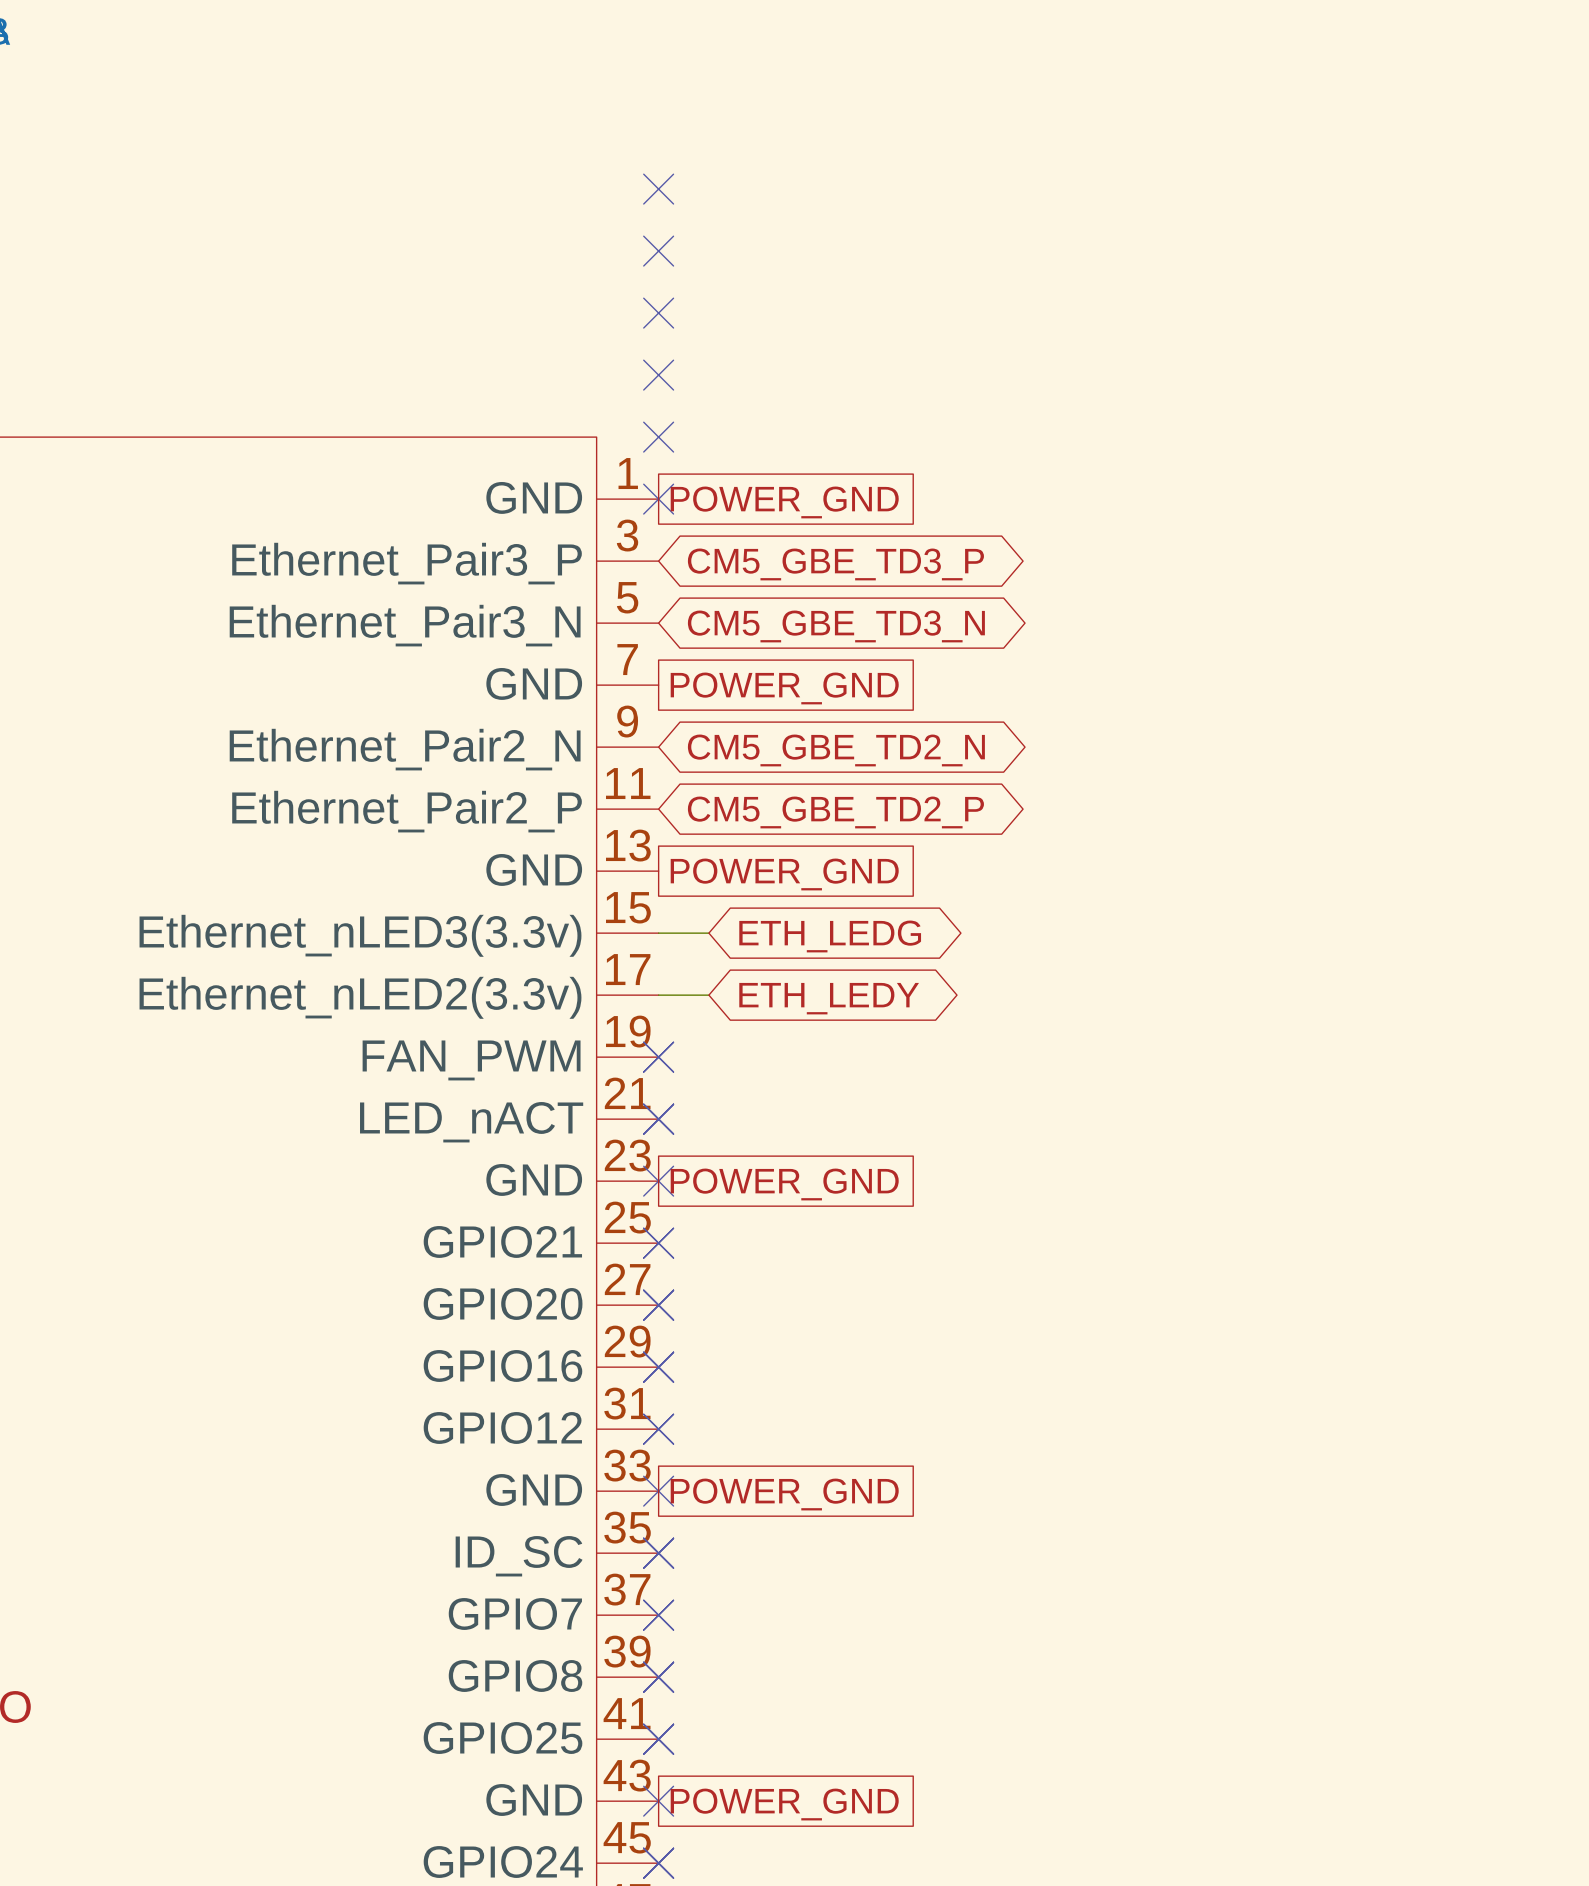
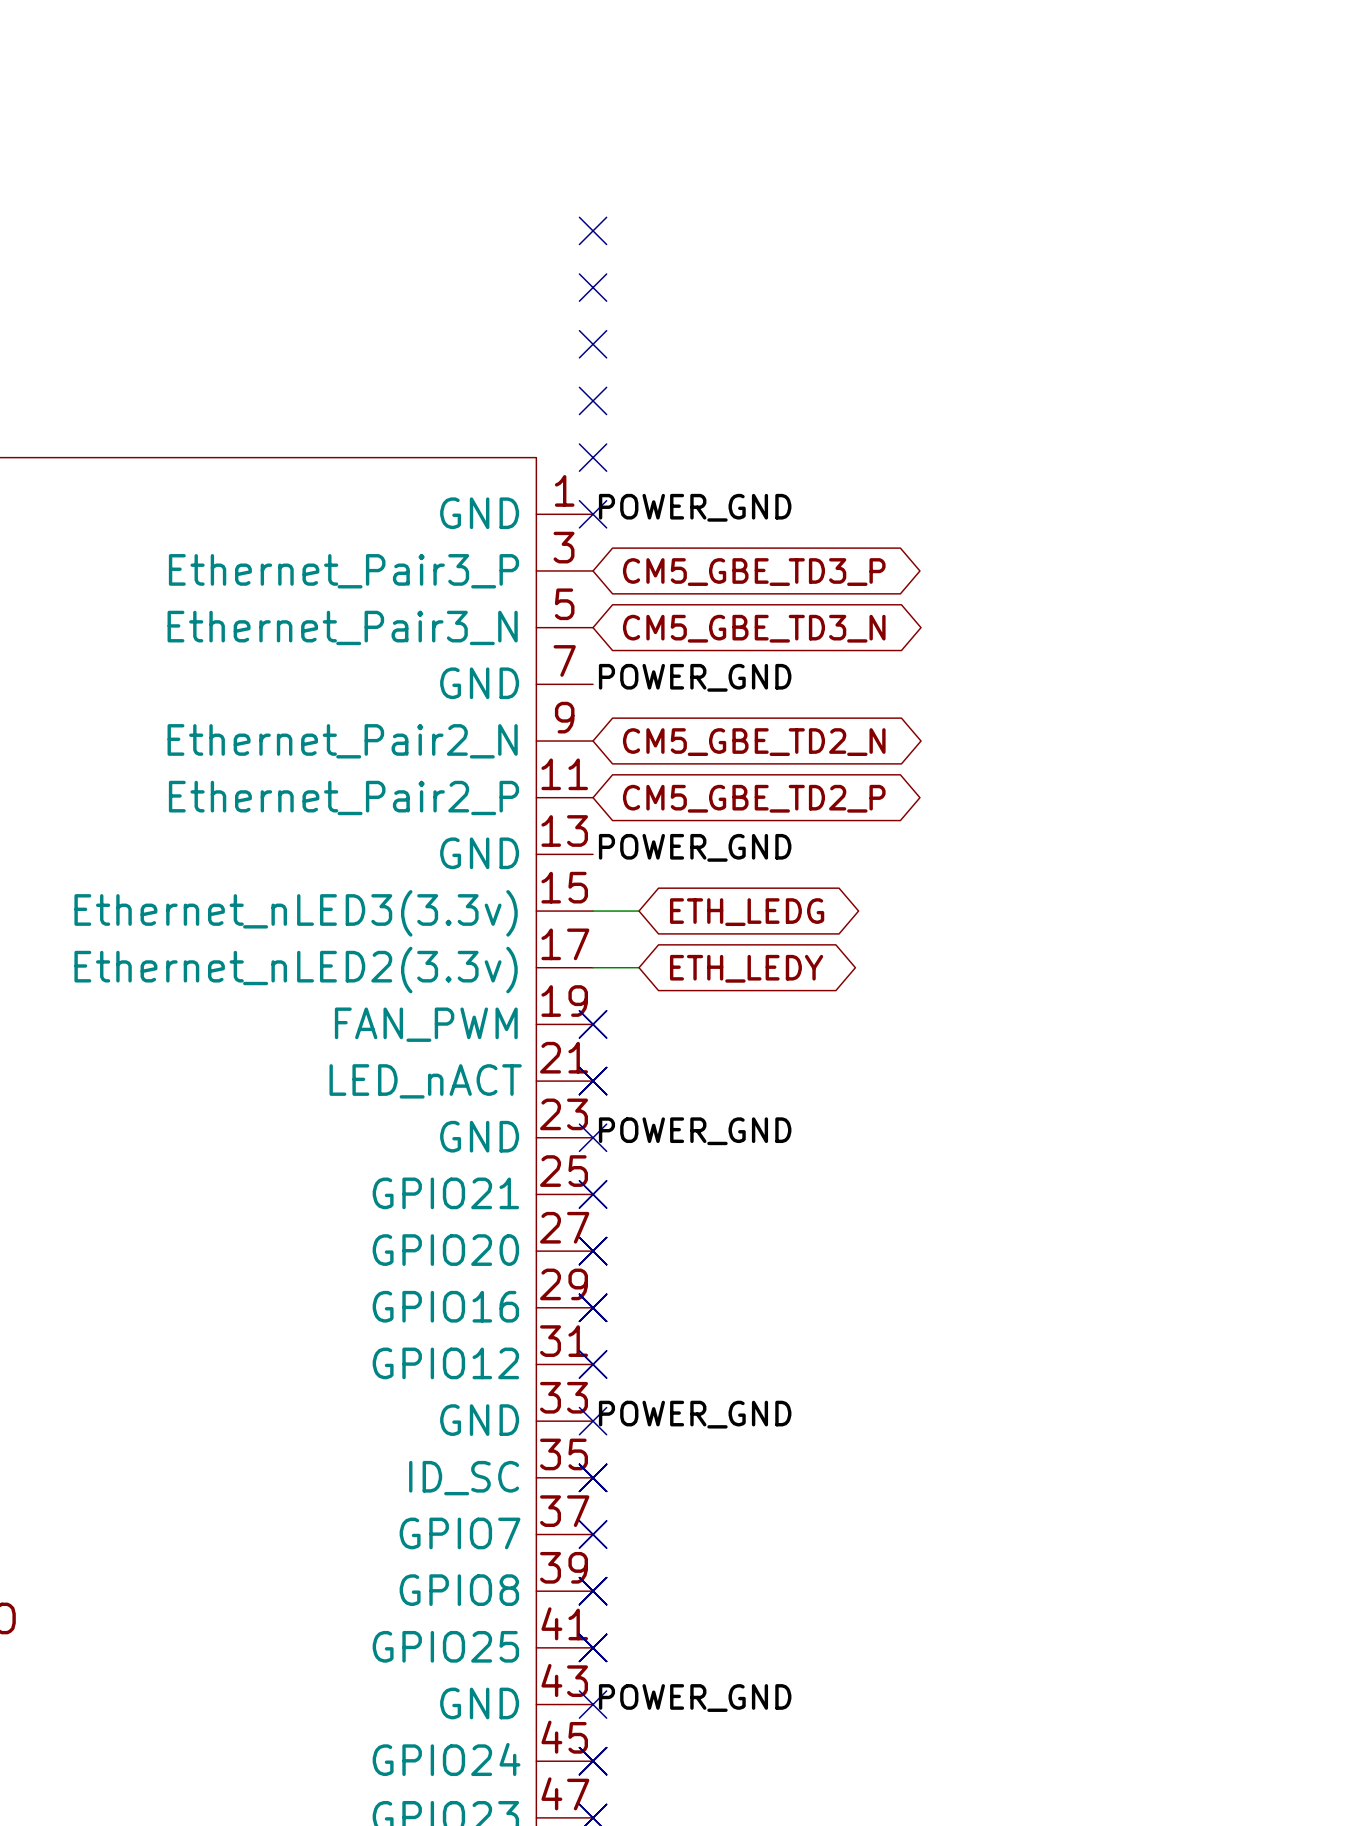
label: none -> POWER_GND (695, 507)
global label: POWER_GND (784, 502) -> none
label: none -> POWER_GND (695, 677)
global label: POWER_GND (784, 688) -> none
label: none -> POWER_GND (695, 847)
global label: POWER_GND (784, 874) -> none
label: none -> POWER_GND (695, 1131)
global label: POWER_GND (784, 1184) -> none
label: none -> POWER_GND (695, 1414)
global label: POWER_GND (784, 1494) -> none
label: none -> POWER_GND (695, 1698)
global label: POWER_GND (784, 1804) -> none

